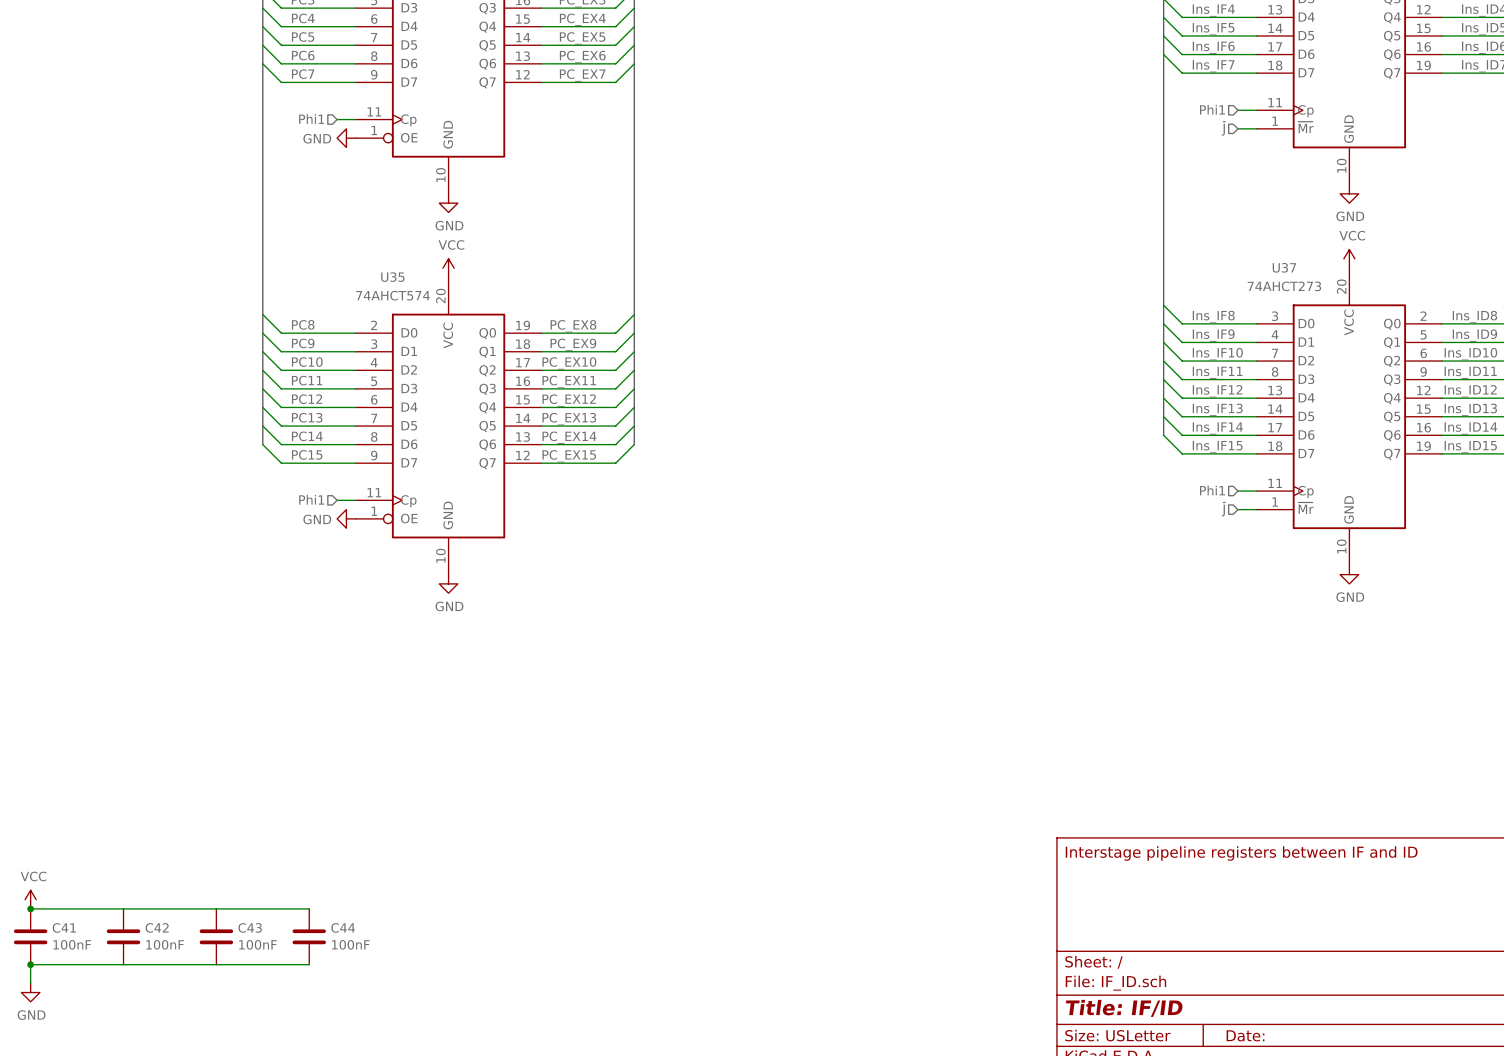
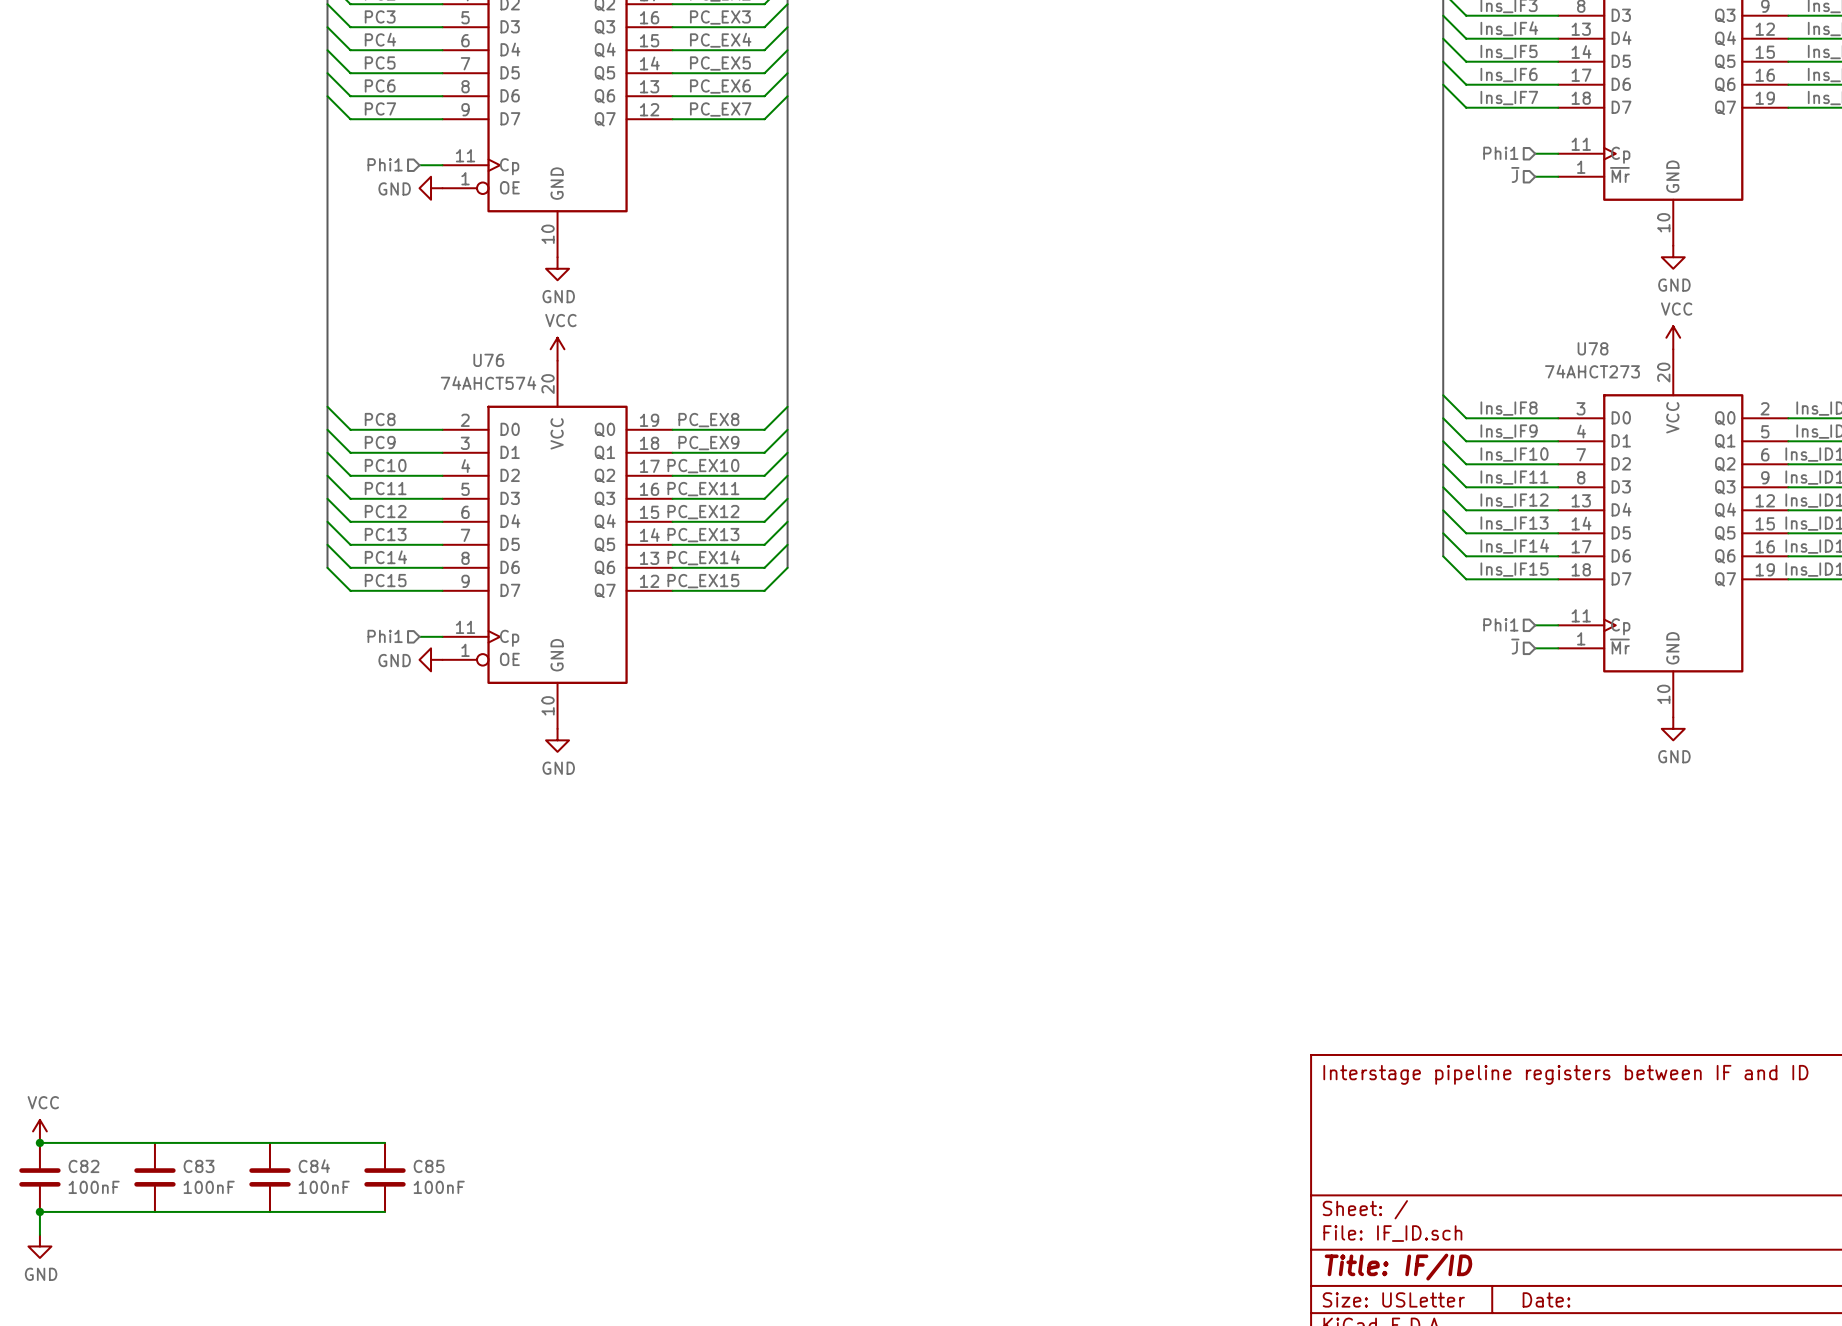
U37 name: U37 (1284, 267) -> U78 (1593, 348)
U35 name: U35 (392, 277) -> U76 (488, 360)
C41 name: C41 (64, 927) -> C82 (84, 1166)
C42 name: C42 (157, 927) -> C83 (199, 1166)
C43 name: C43 (250, 927) -> C84 (314, 1166)
C44 name: C44 (343, 927) -> C85 (429, 1166)

